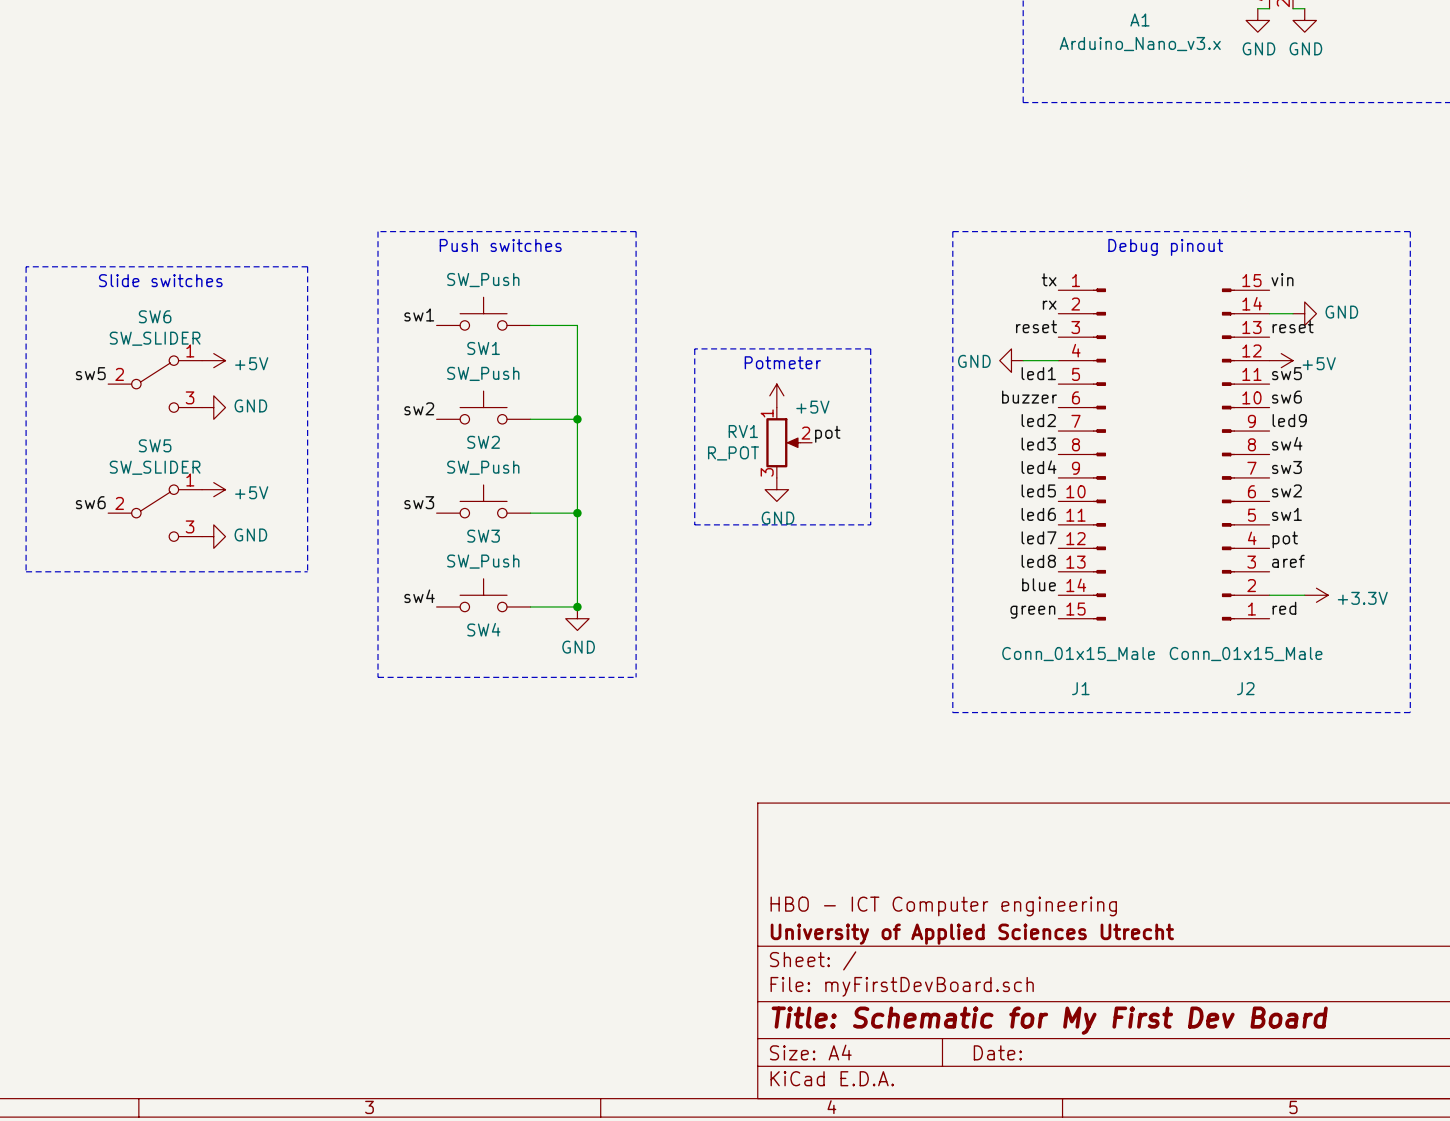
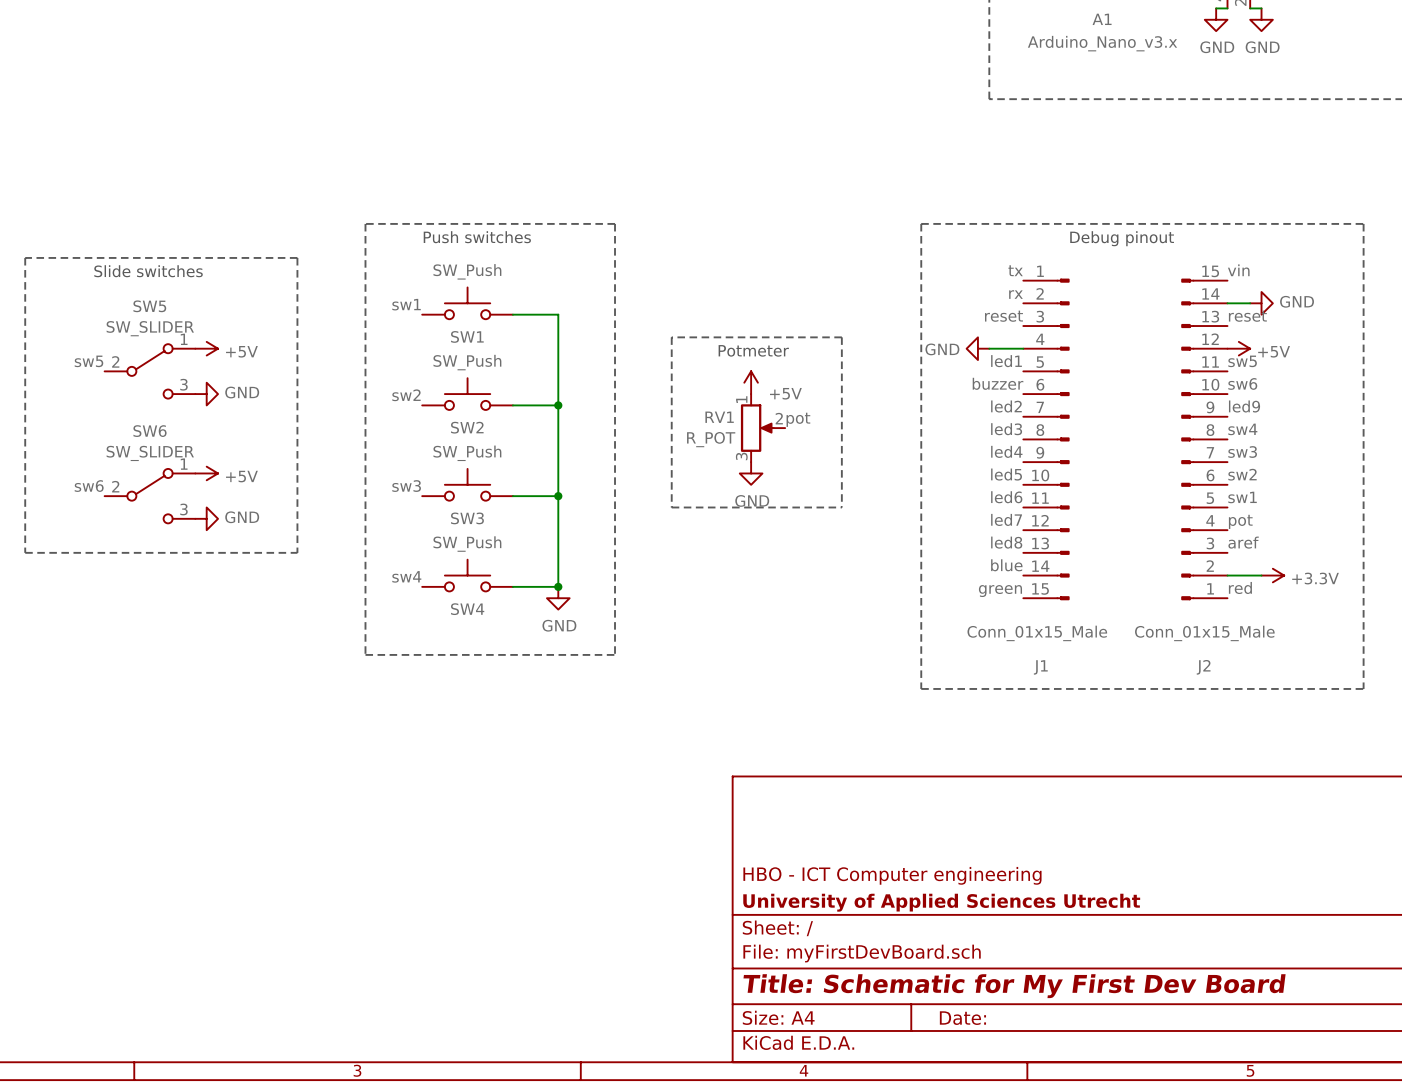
SW6 name: SW6 (155, 316) -> SW5 (149, 306)
SW5 name: SW5 (155, 445) -> SW6 (150, 431)

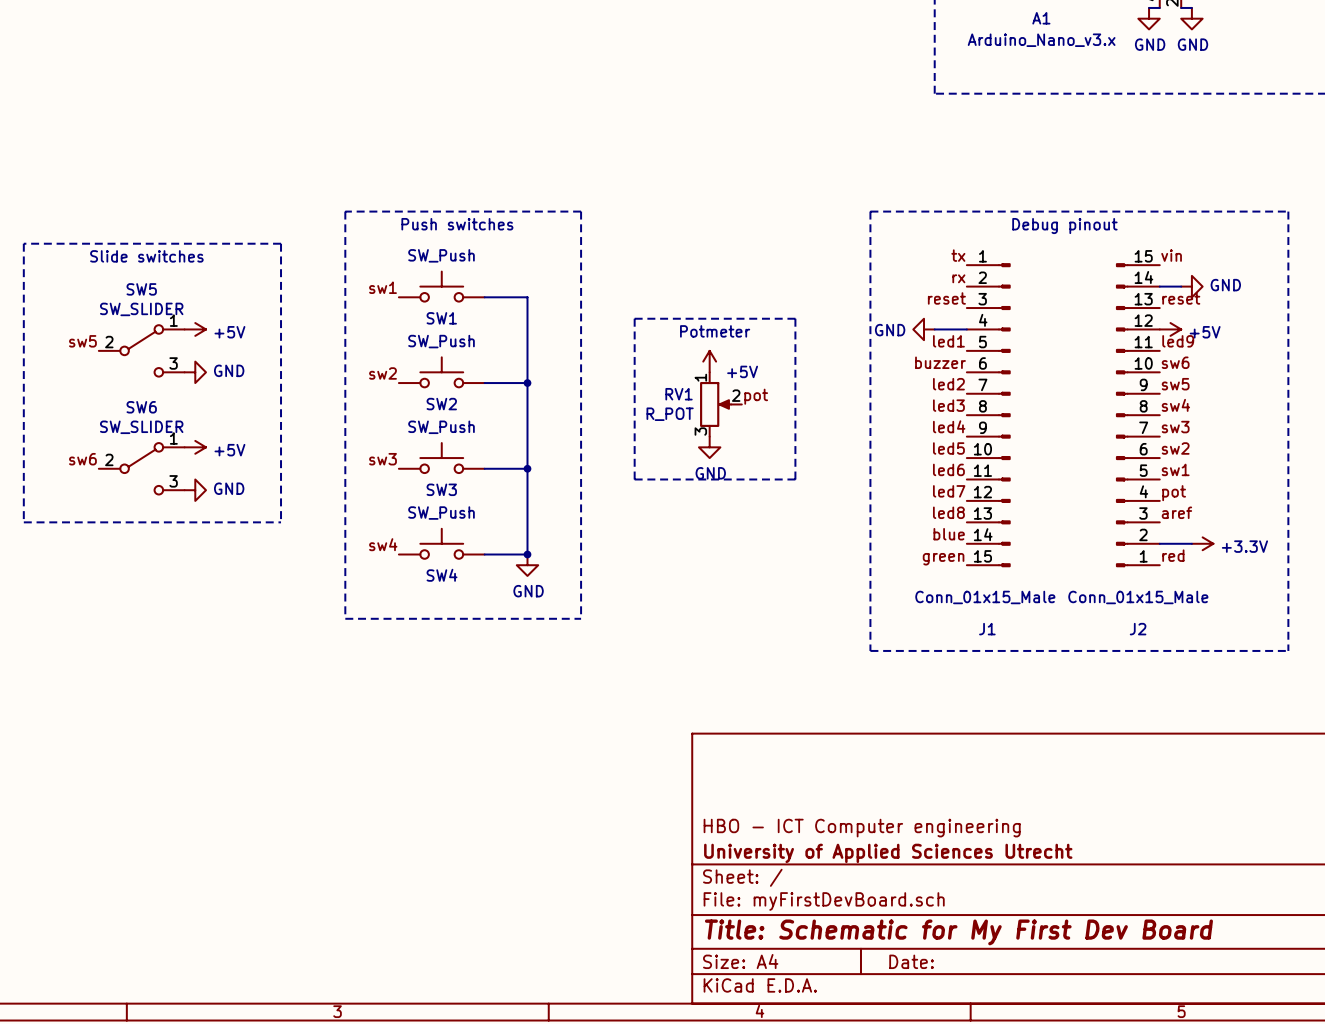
label: sw5 (1242, 361) -> led9 (1178, 341)
label: led9 (1244, 406) -> sw5 (1175, 384)

